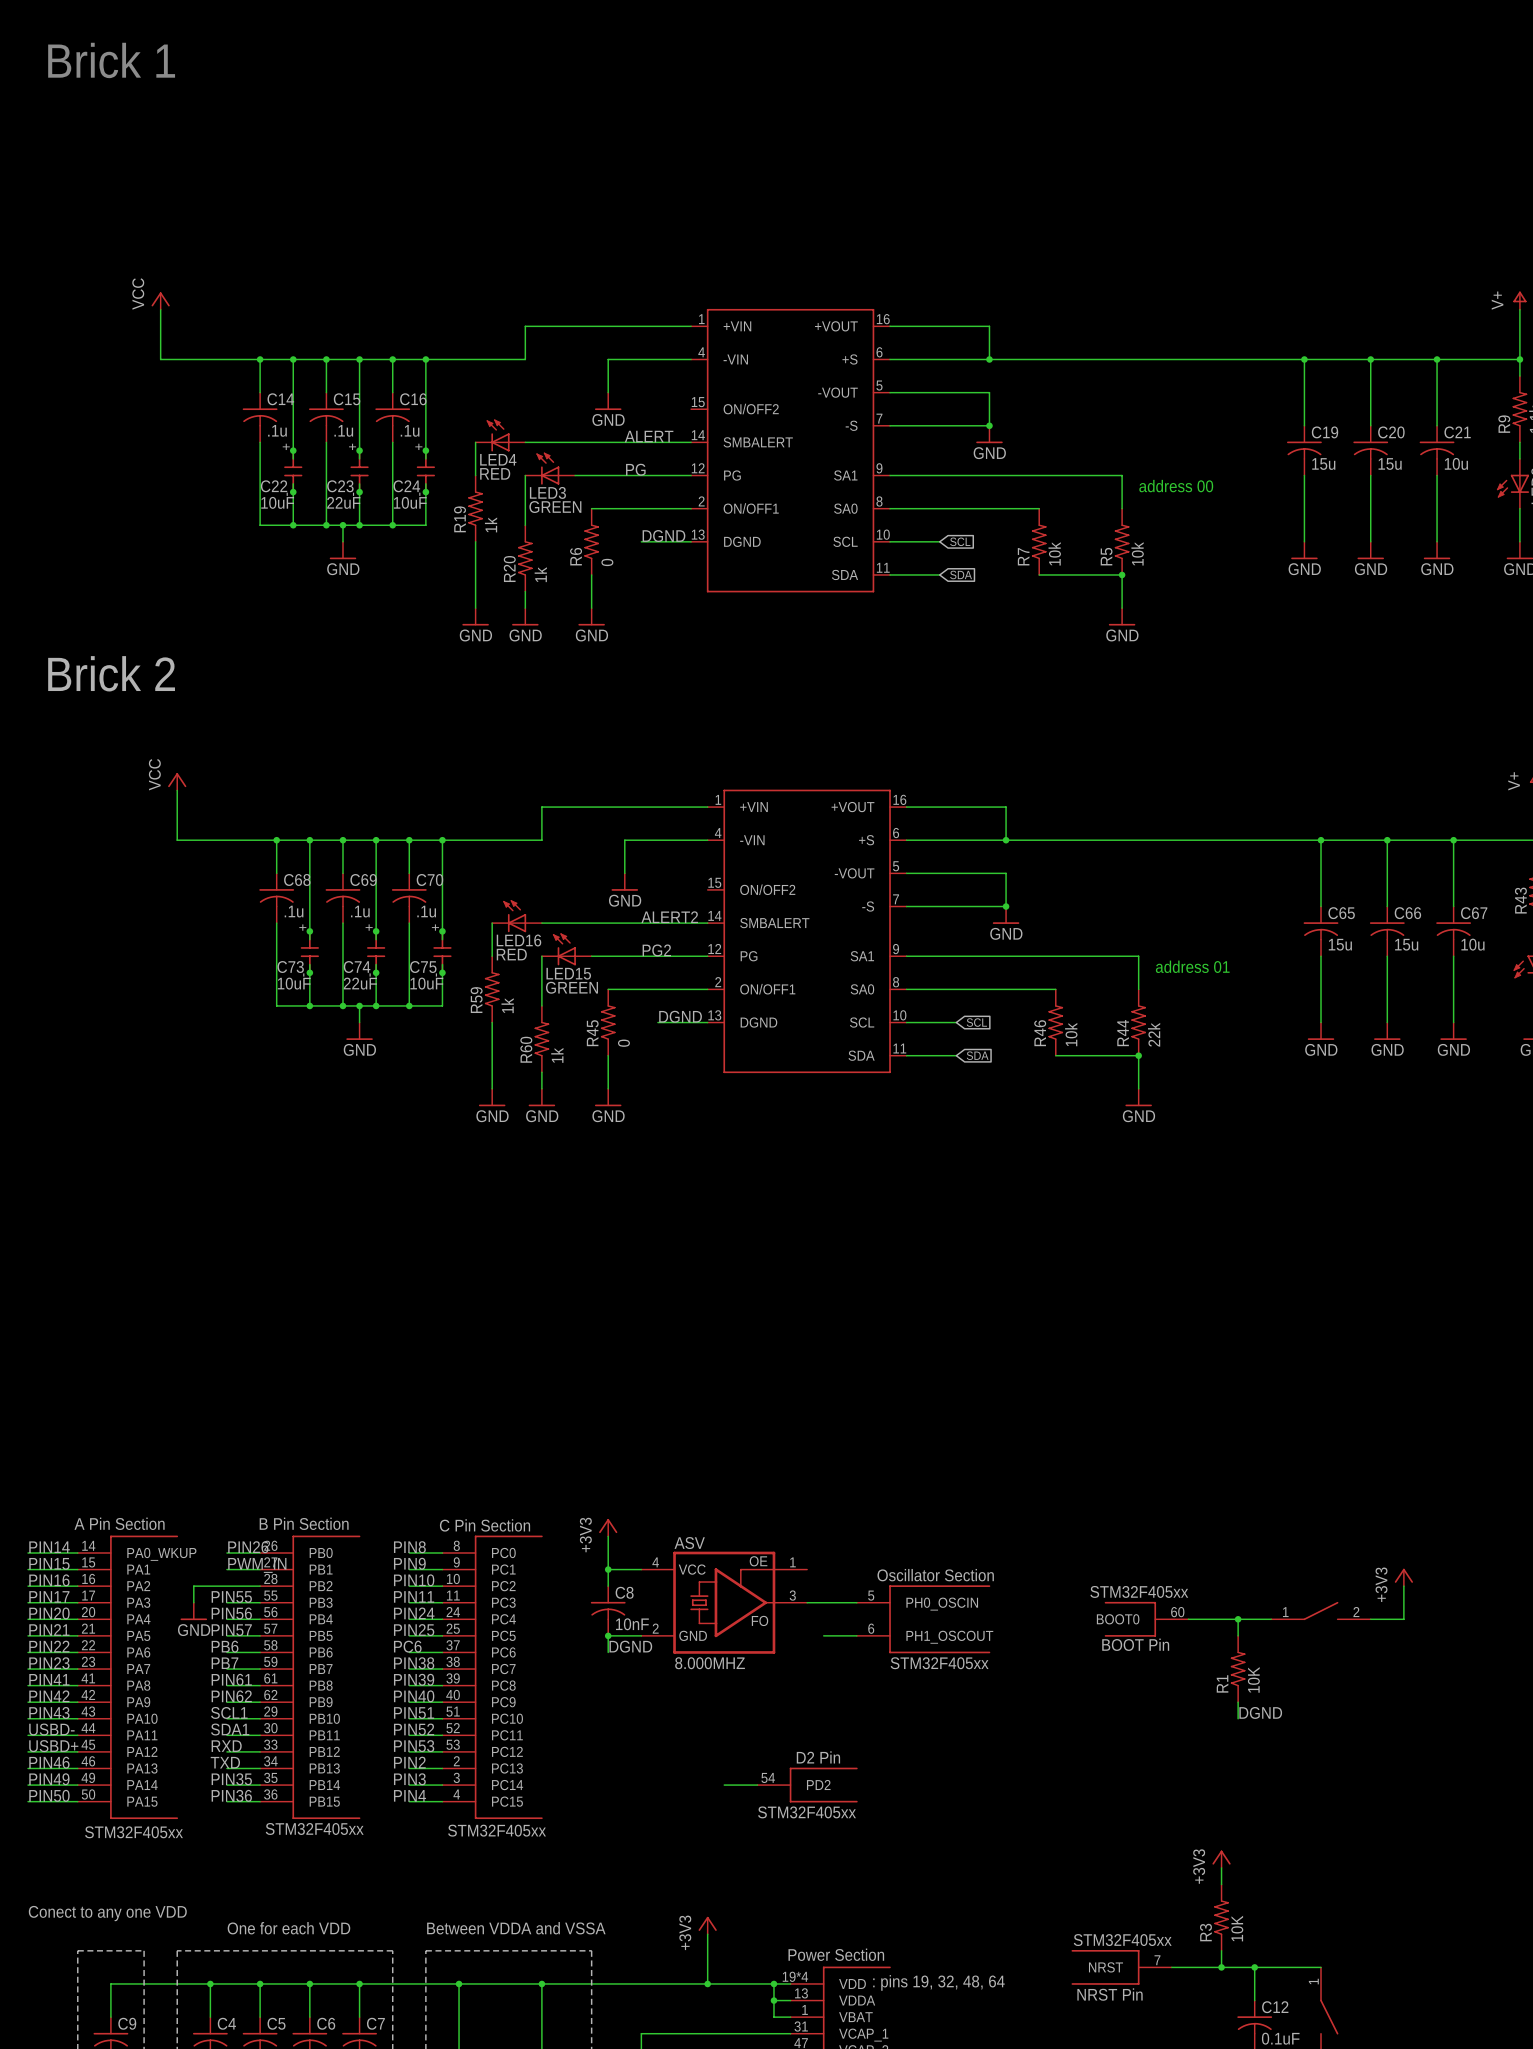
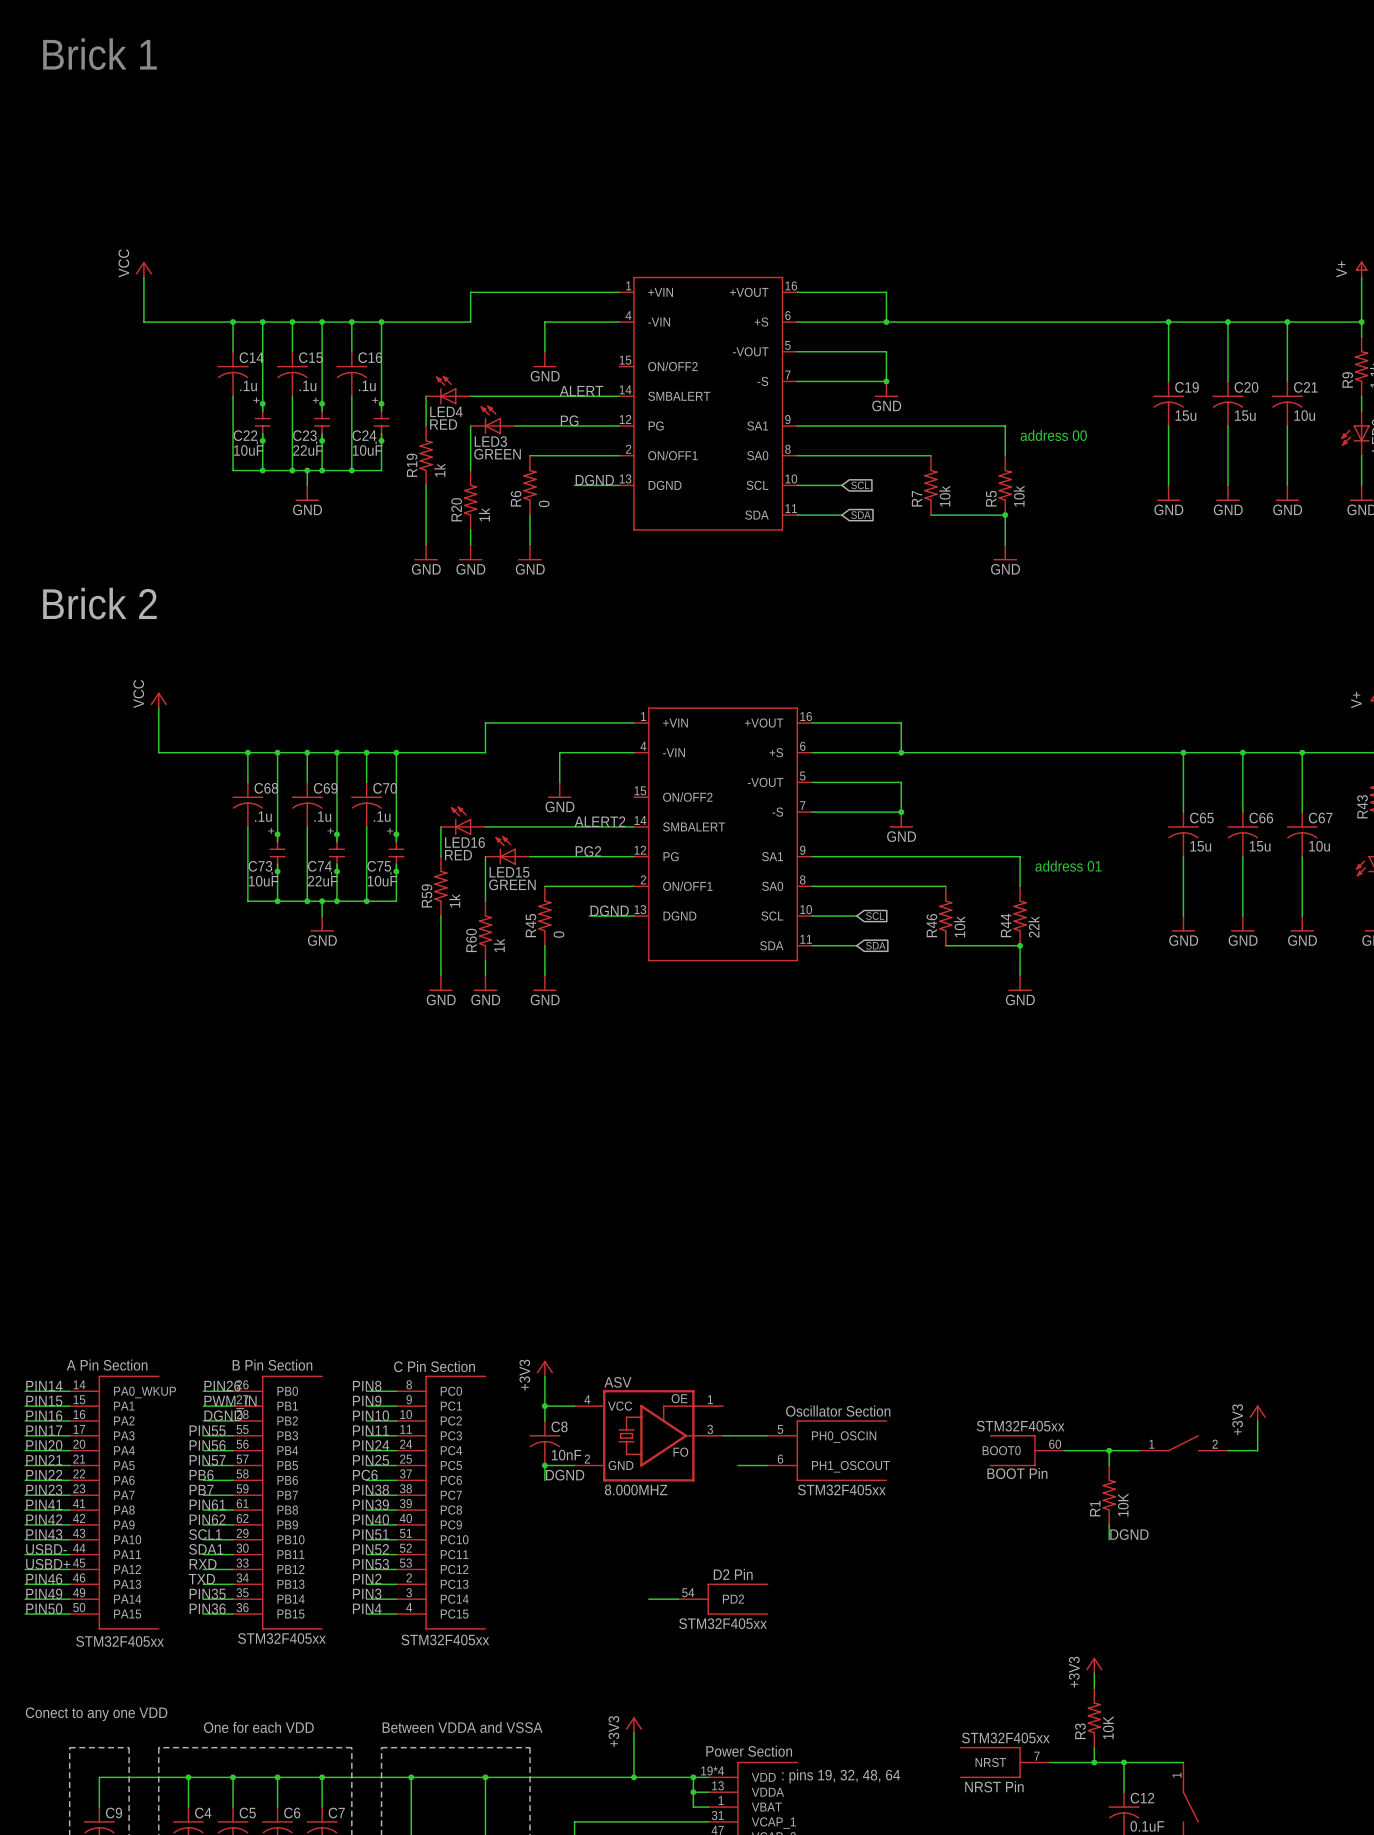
label: none -> DGND (223, 1415)
wire: (226, 1586) (193, 1586) (193, 1602) -> none
power symbol: GND (193, 1611) -> none

